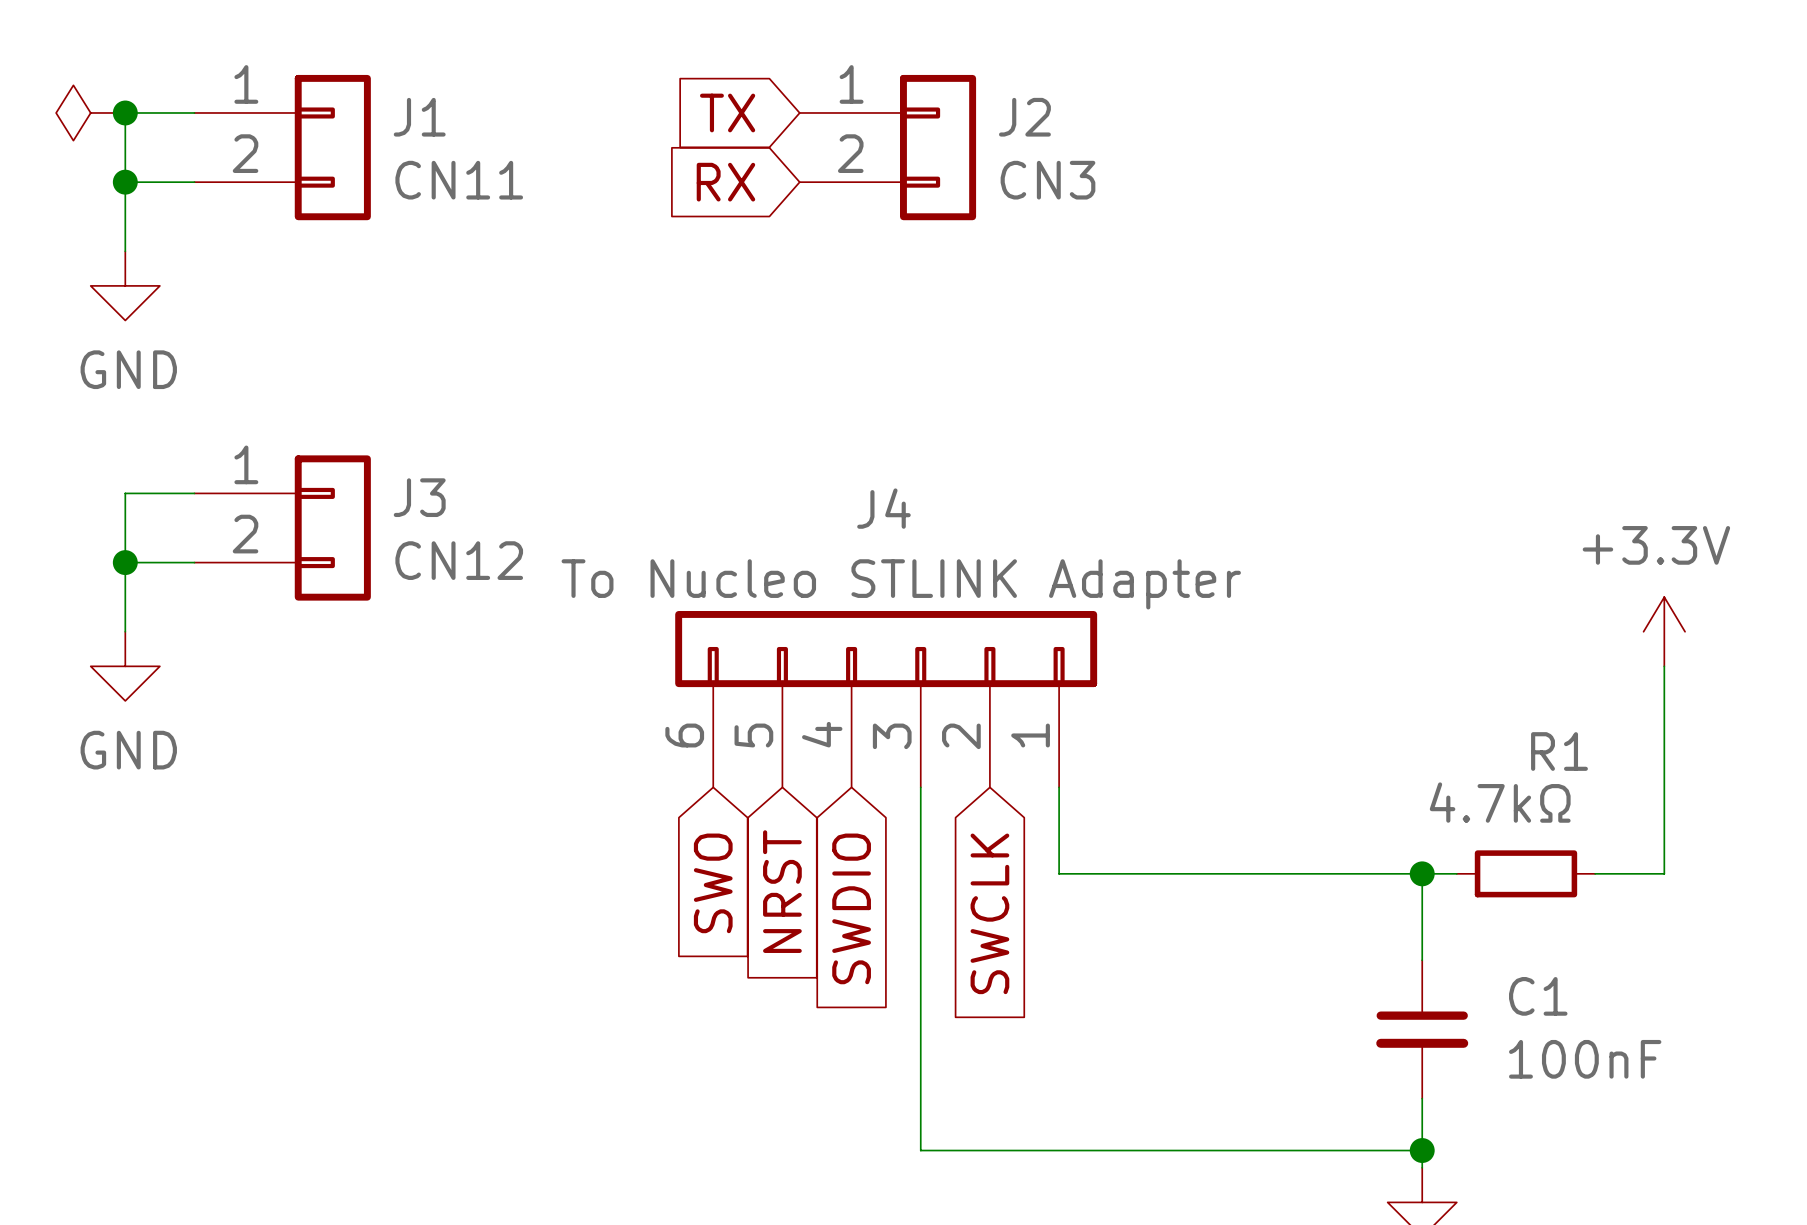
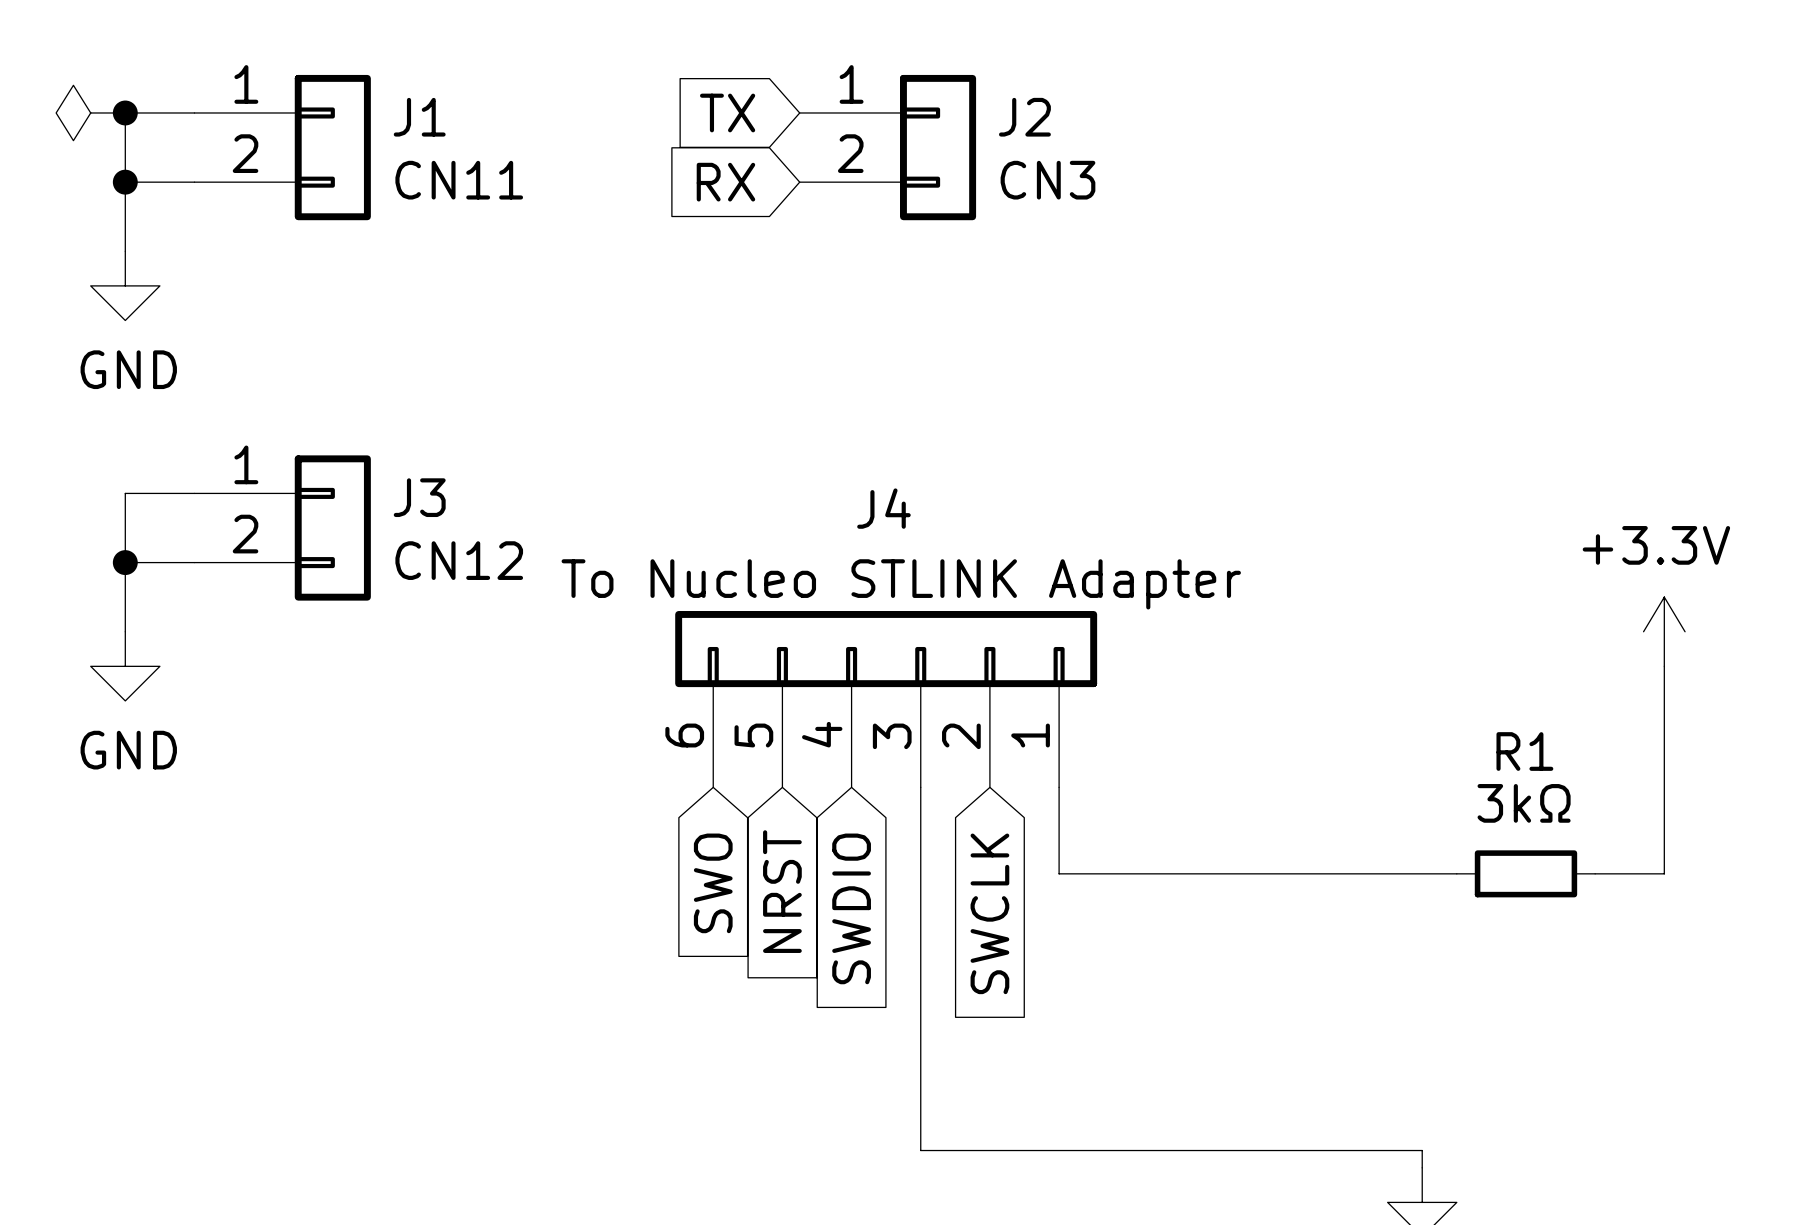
R1 name position: R1 (1559, 751) -> R1 (1524, 751)
R1 value: 4.7kΩ (1500, 802) -> 3kΩ (1524, 803)
wire: (1422, 873) (1422, 960) -> none
junction: (1422, 873) -> none
C1: 100nF (1422, 1029) -> none
wire: (1422, 1098) (1422, 1150) -> none
junction: (1422, 1150) -> none

